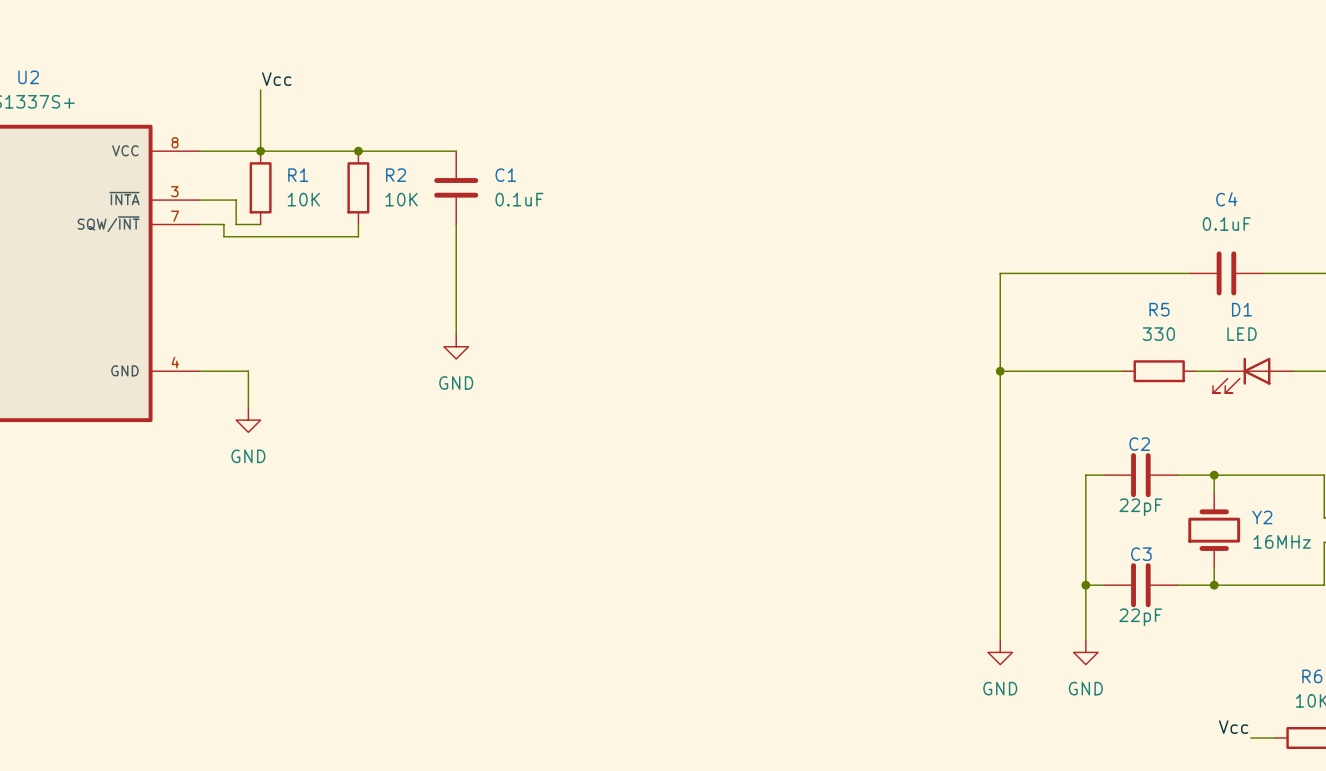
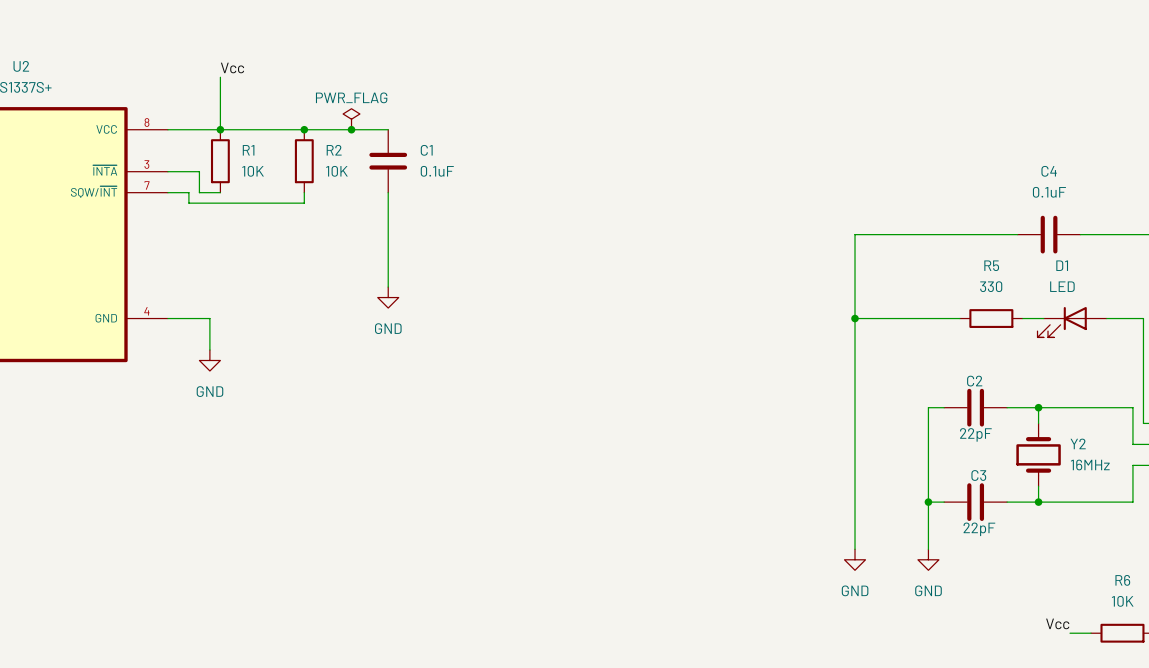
power symbol: none -> PWR_FLAG (351, 119)
junction: none -> (351, 129)

